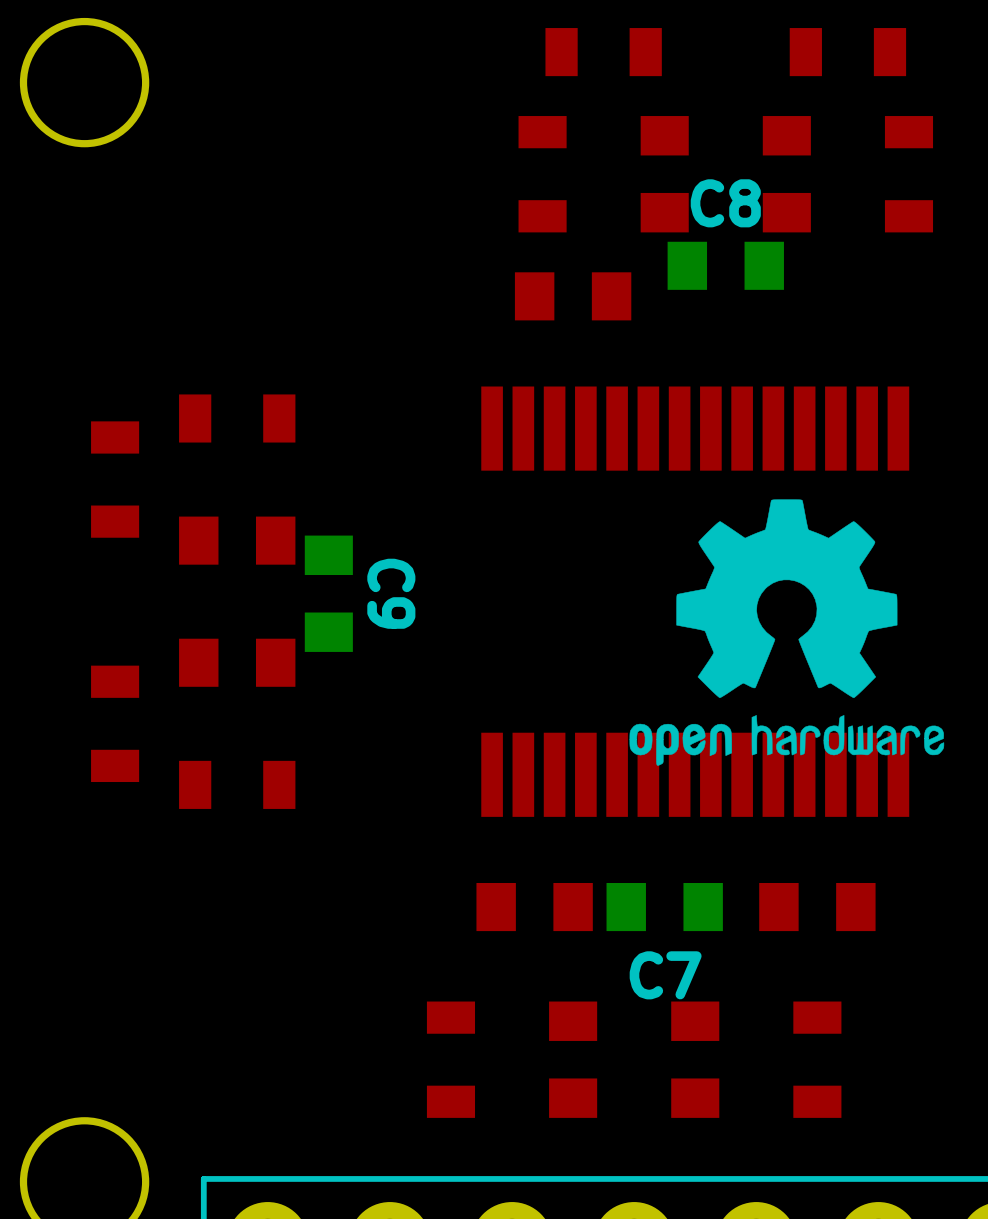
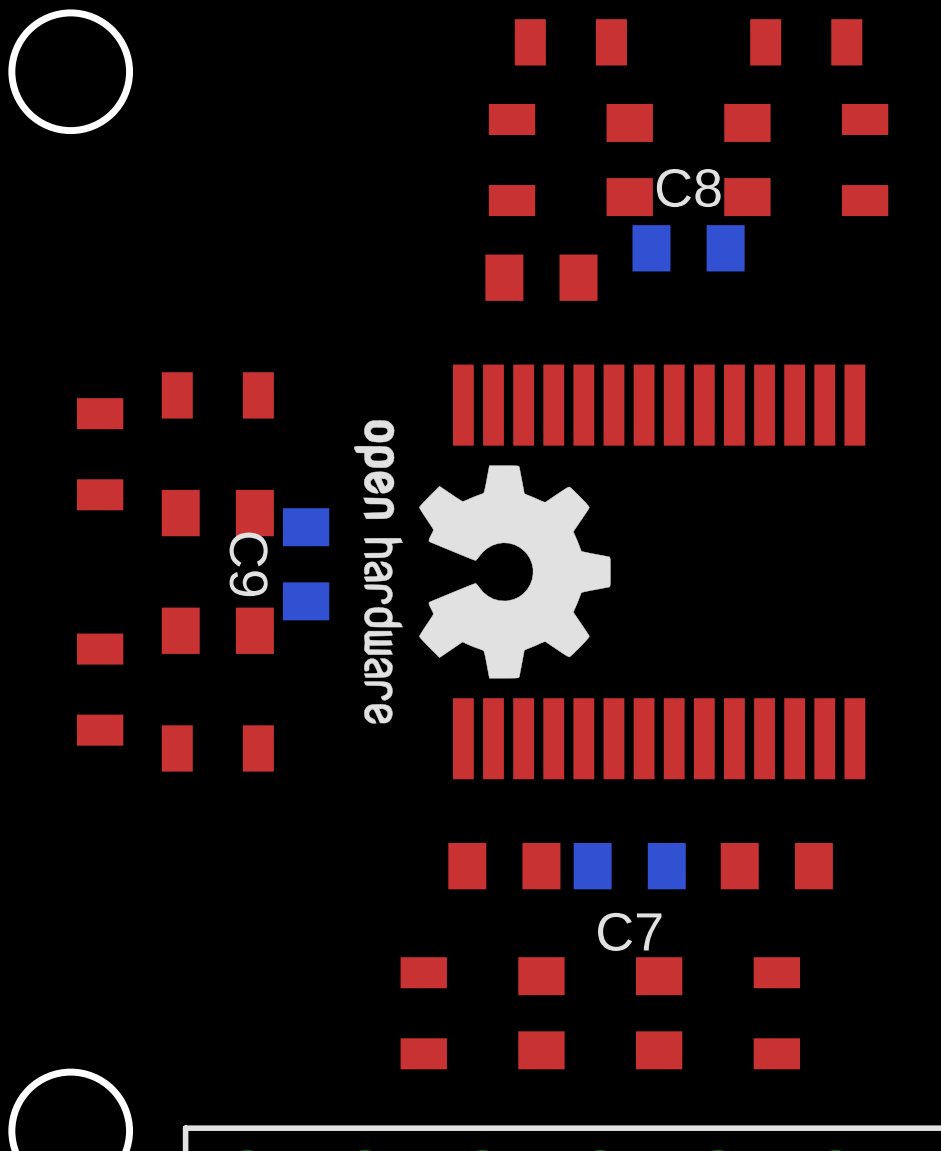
drawing: none -> [353, 420, 611, 724]
drawing: [629, 499, 945, 766] -> none
C9 name position: C9 (391, 593) -> C9 (248, 564)

